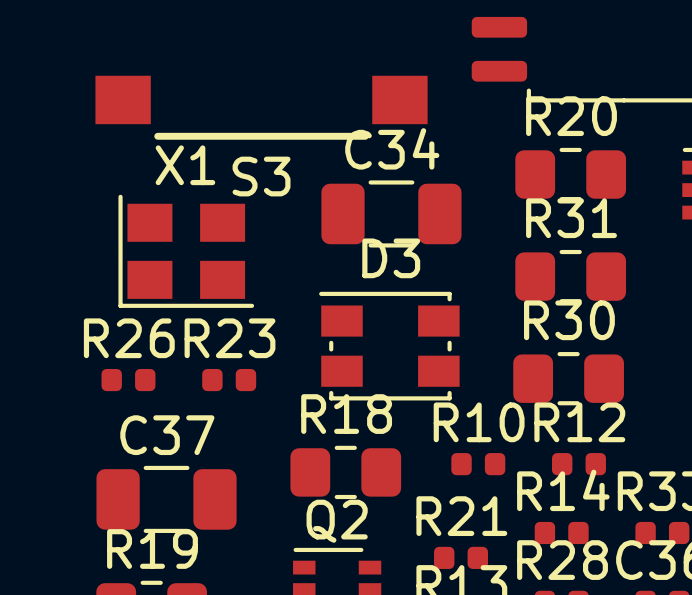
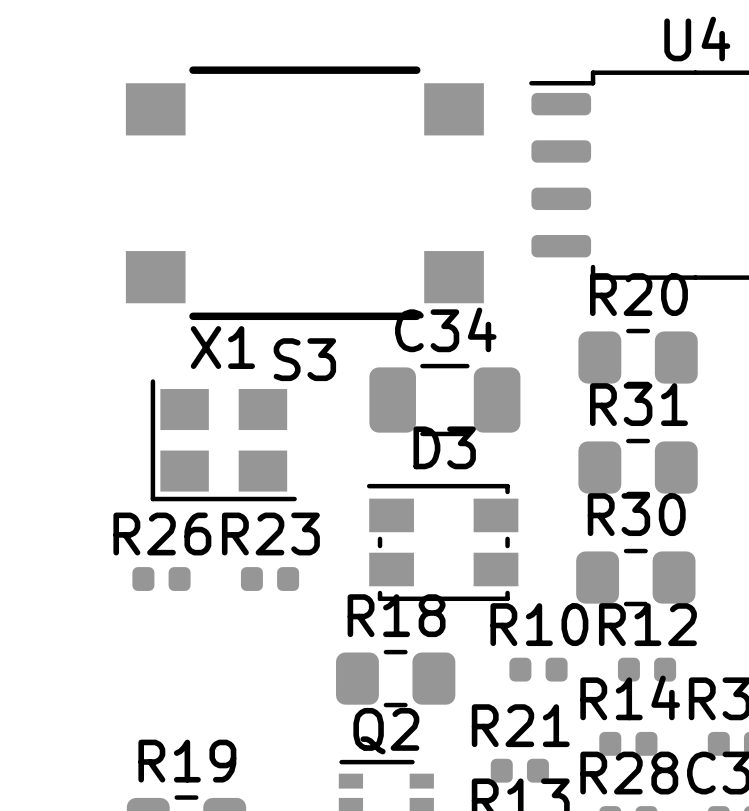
C37: (166, 499) -> none

